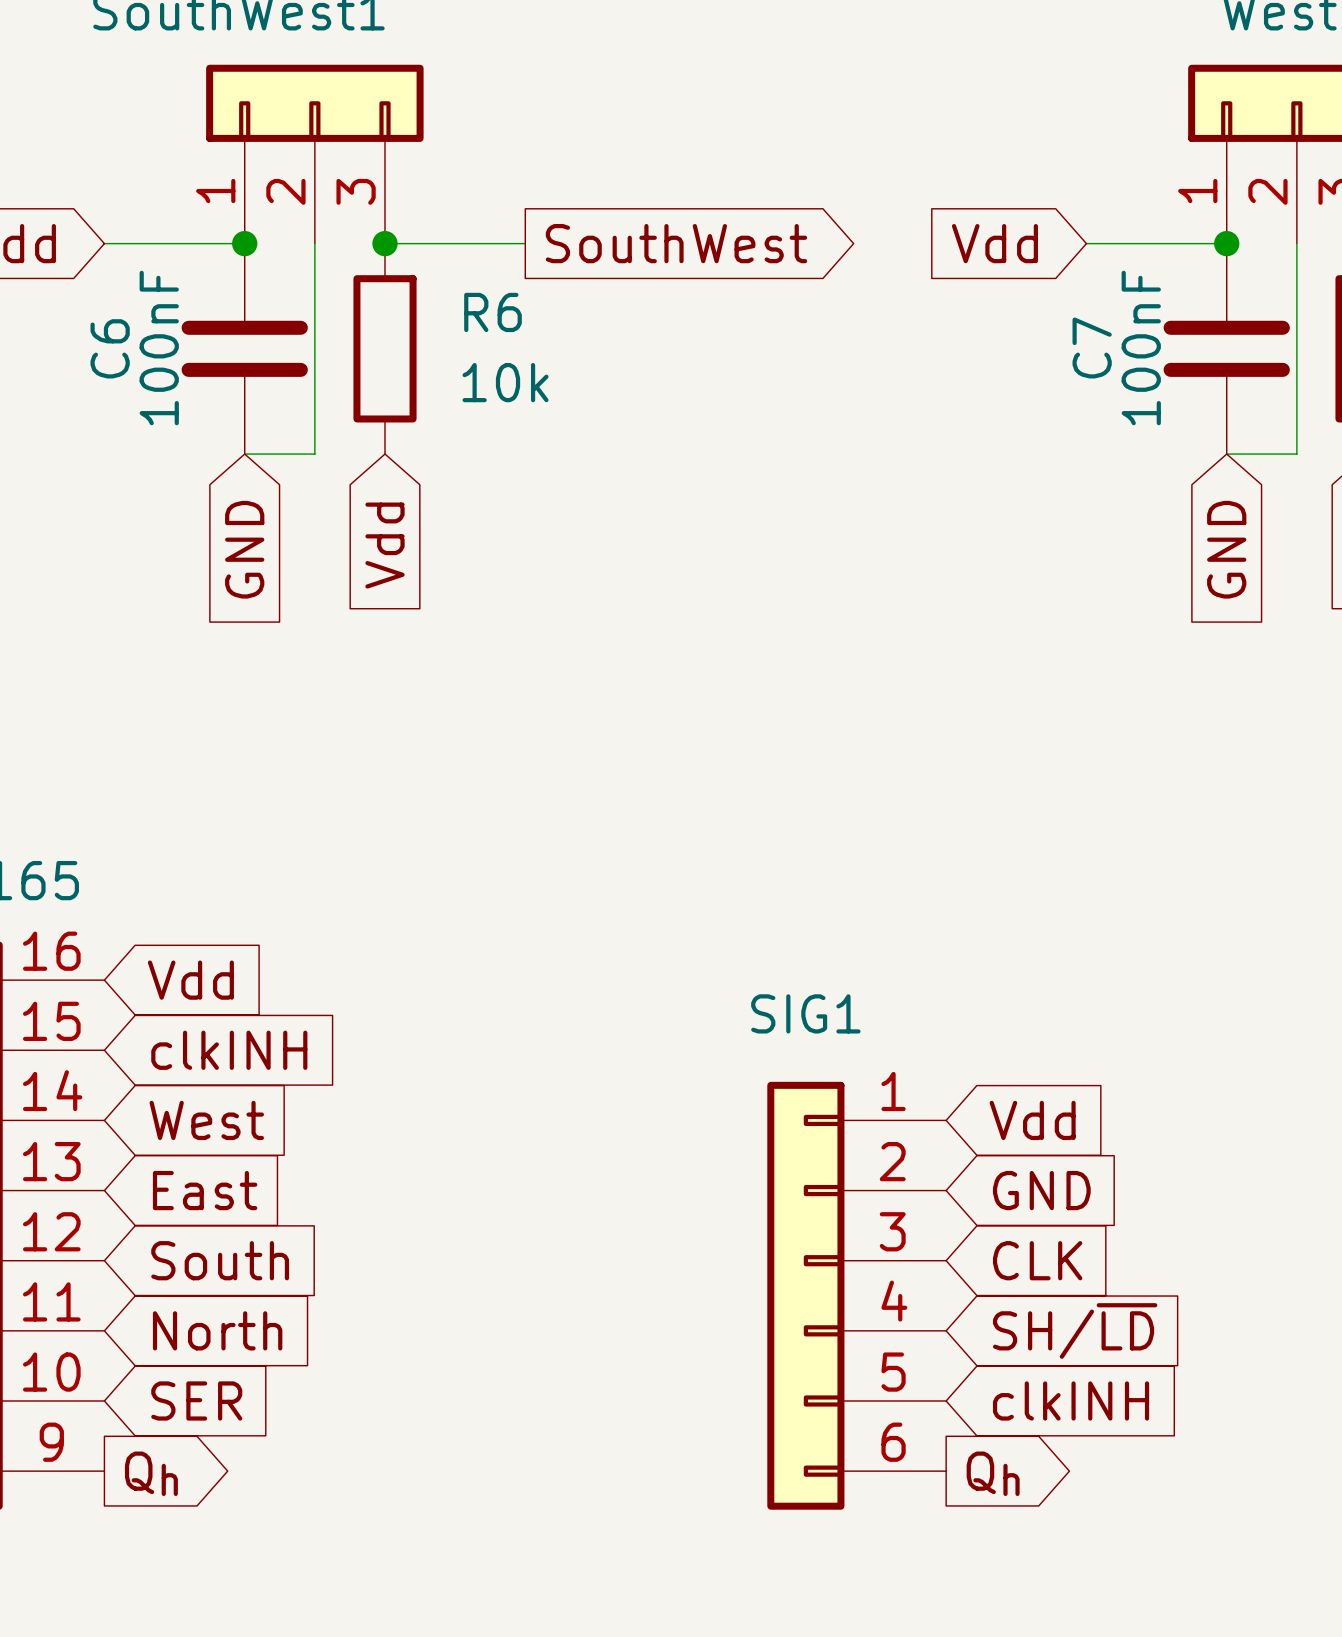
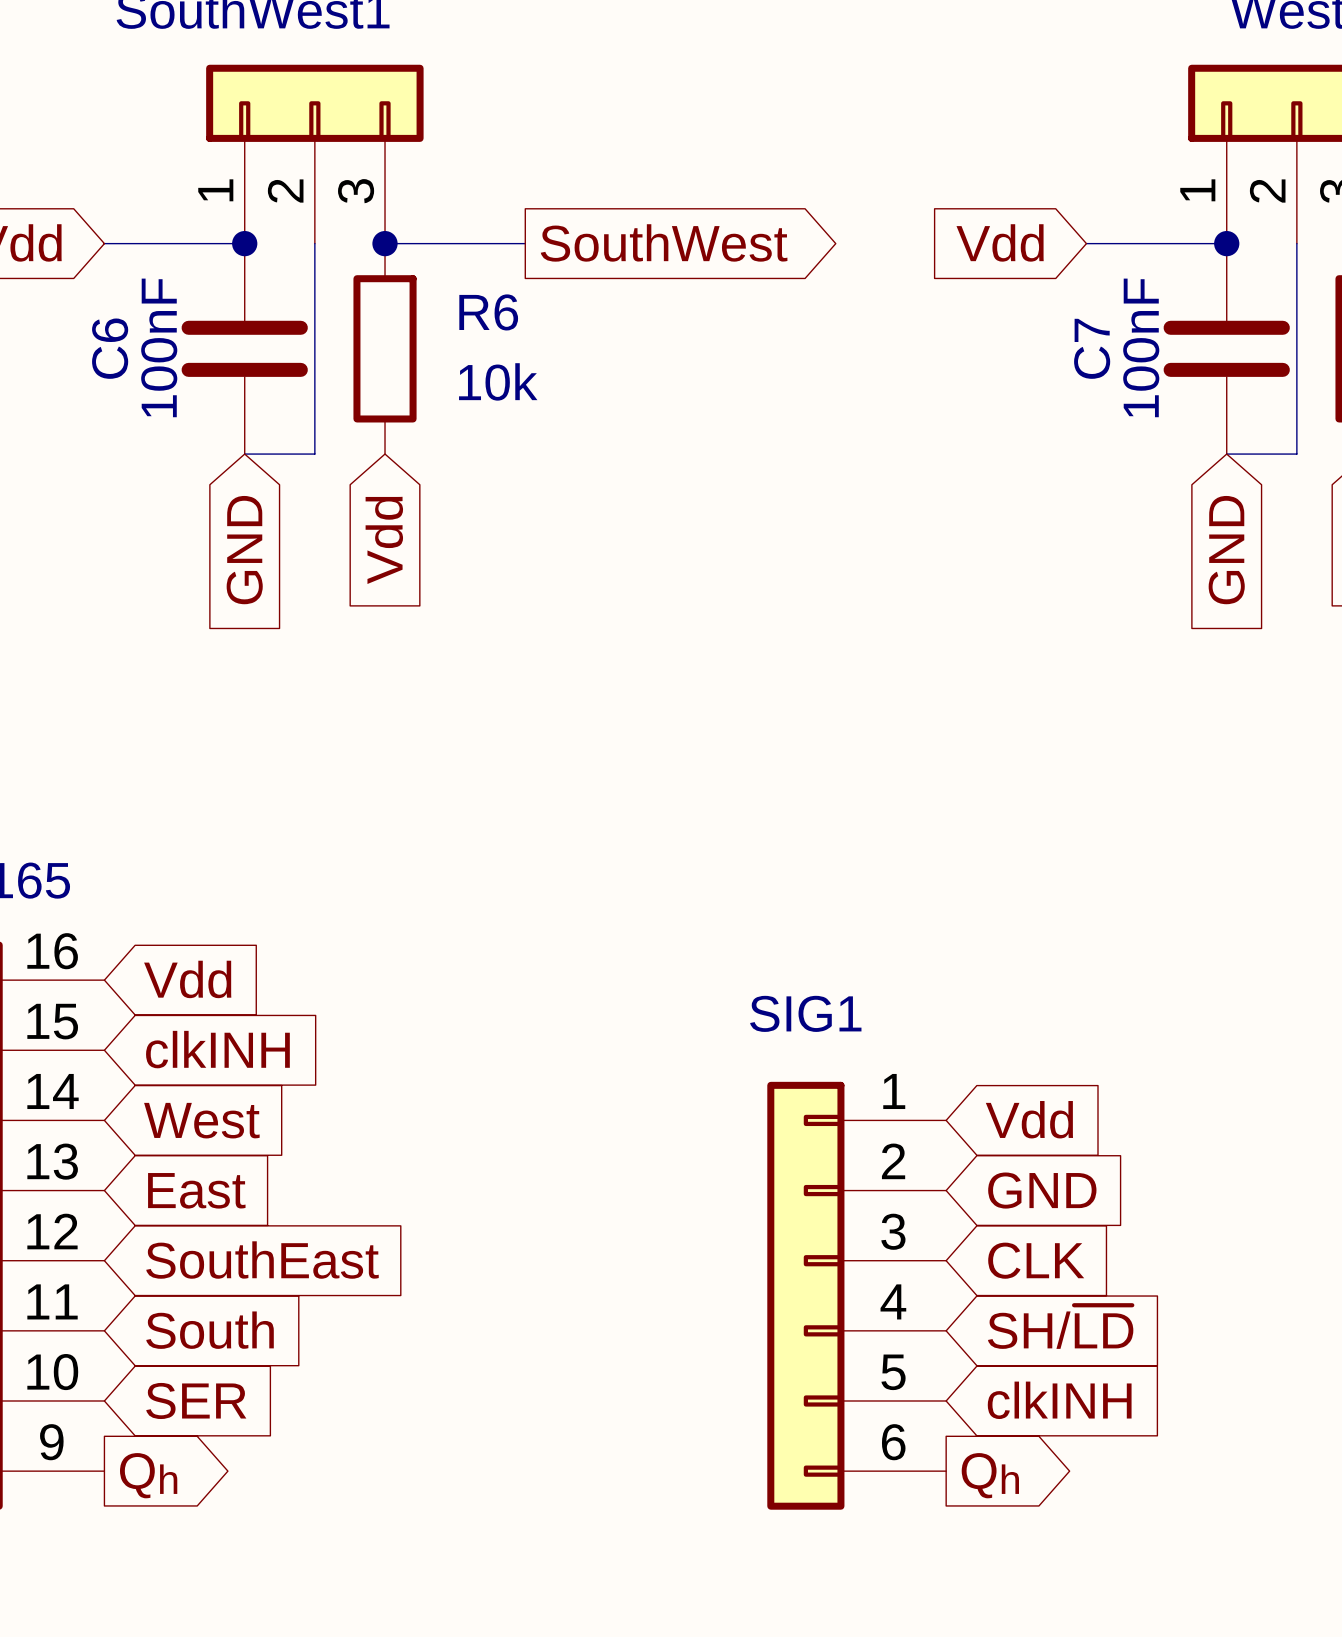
global label: South (220, 1260) -> SouthEast (262, 1260)
global label: North (217, 1330) -> South (210, 1330)

